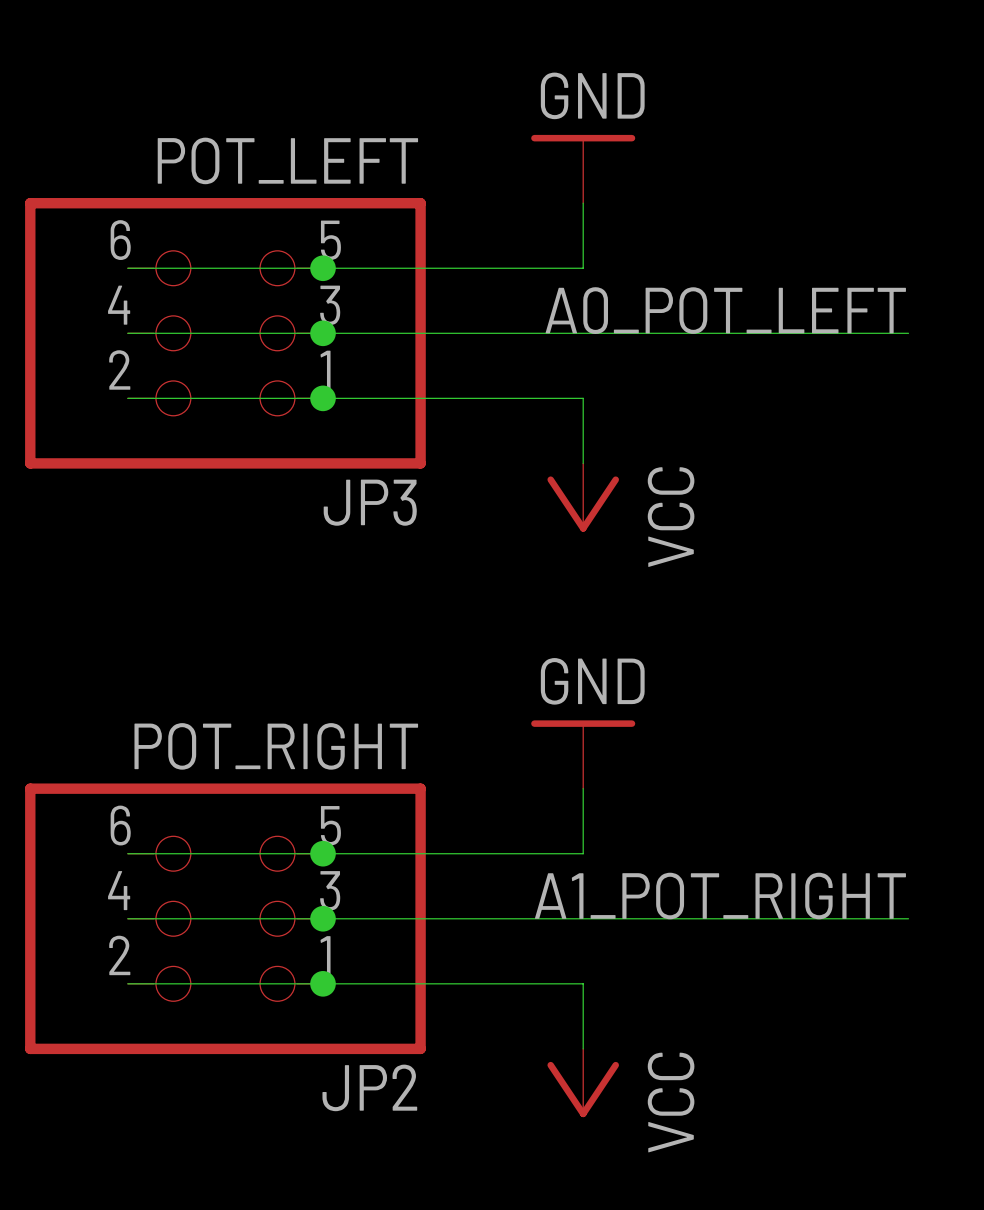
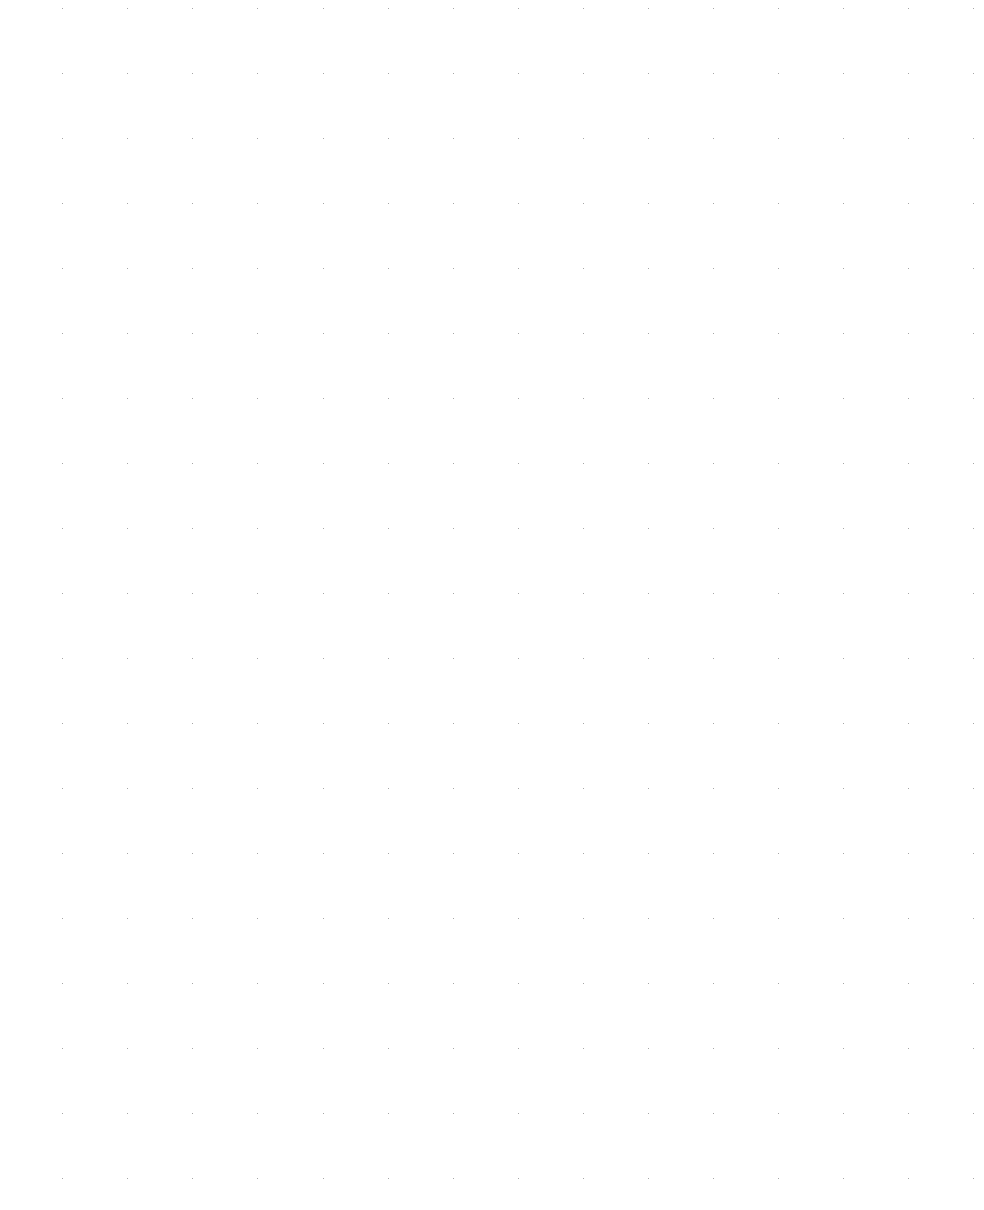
power symbol: GND (583, 169) -> none
wire: (583, 203) (583, 268) (127, 268) -> none
junction: (323, 268) -> none
label: A0_POT_LEFT (725, 310) -> none
wire: (127, 333) (908, 333) -> none
JP3: POT_LEFT (225, 333) -> none
junction: (323, 333) -> none
wire: (127, 398) (583, 398) (583, 463) -> none
junction: (323, 398) -> none
power symbol: VCC (583, 497) -> none
power symbol: GND (583, 754) -> none
wire: (583, 788) (583, 853) (127, 853) -> none
junction: (323, 853) -> none
label: A1_POT_RIGHT (720, 896) -> none
wire: (127, 918) (908, 918) -> none
JP2: POT_RIGHT (225, 918) -> none
junction: (323, 918) -> none
wire: (127, 983) (583, 983) (583, 1048) -> none
junction: (323, 983) -> none
power symbol: VCC (583, 1083) -> none

